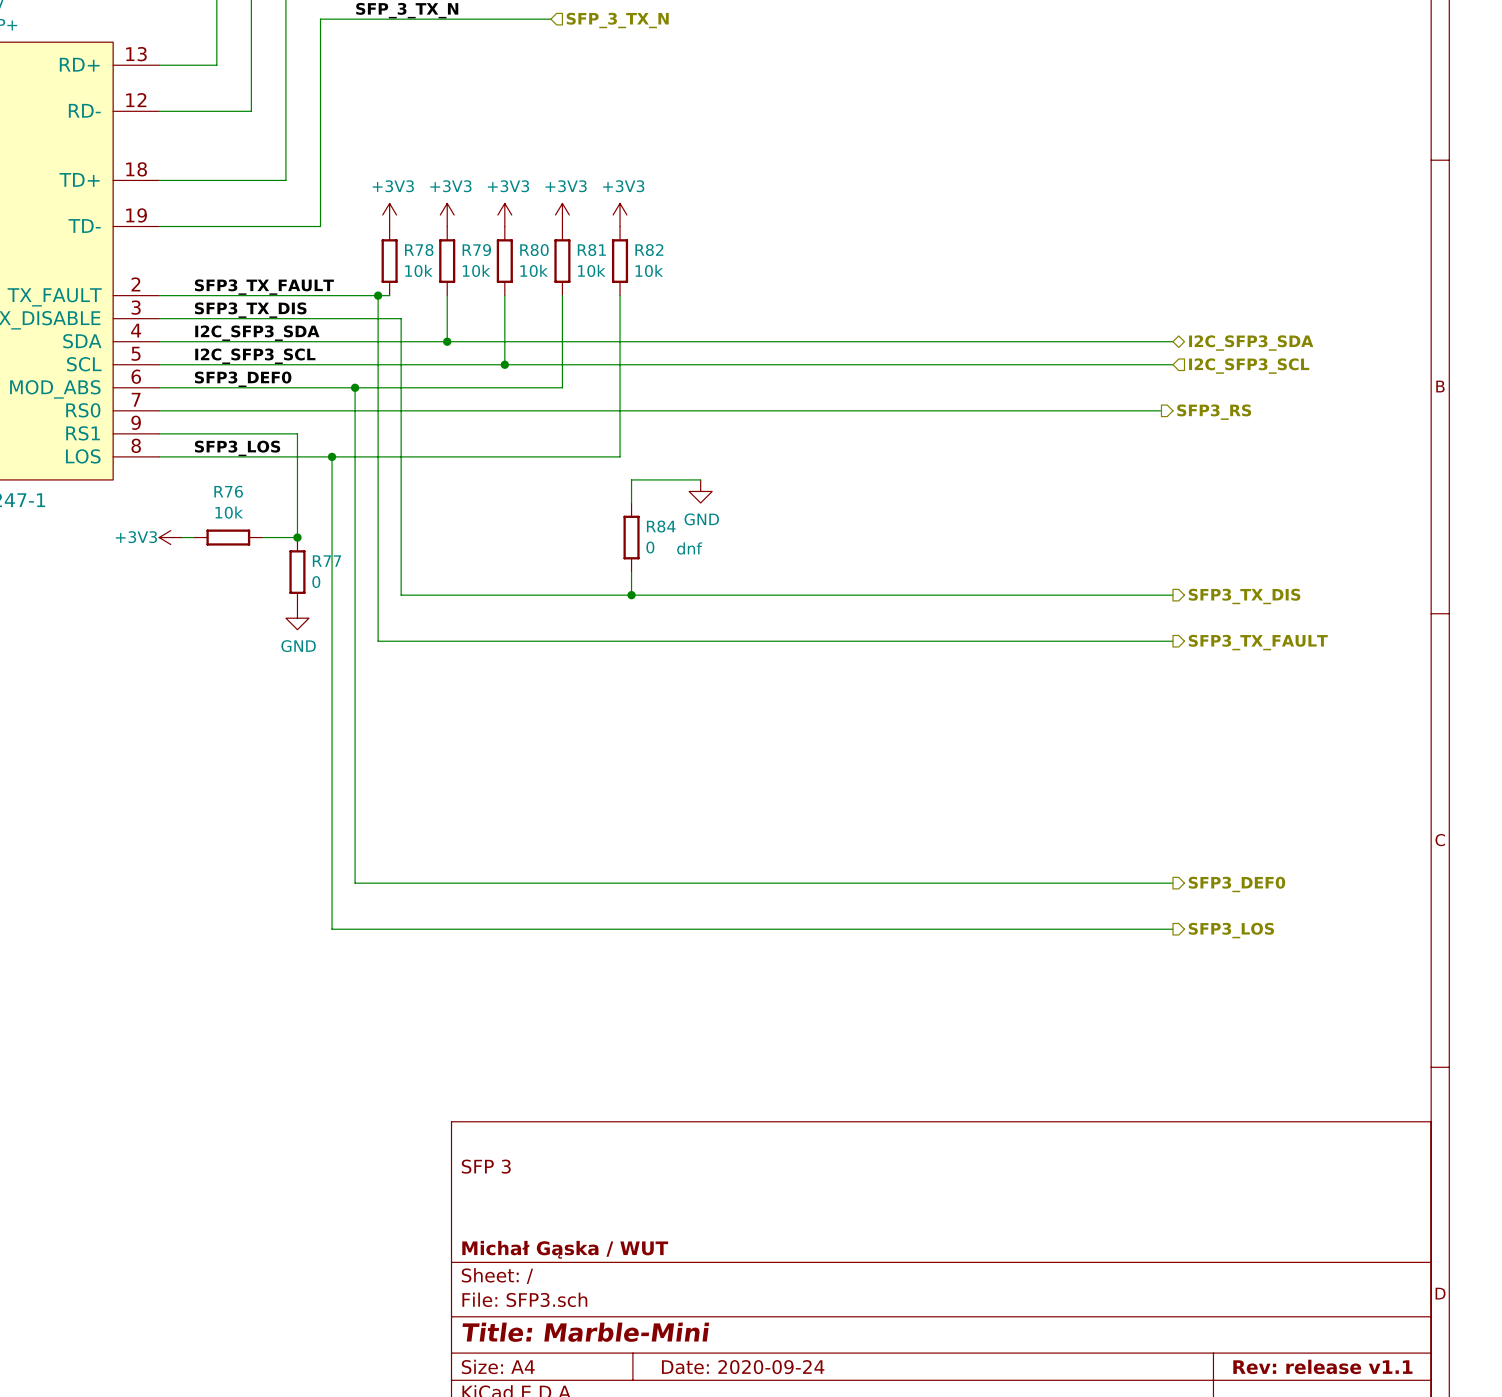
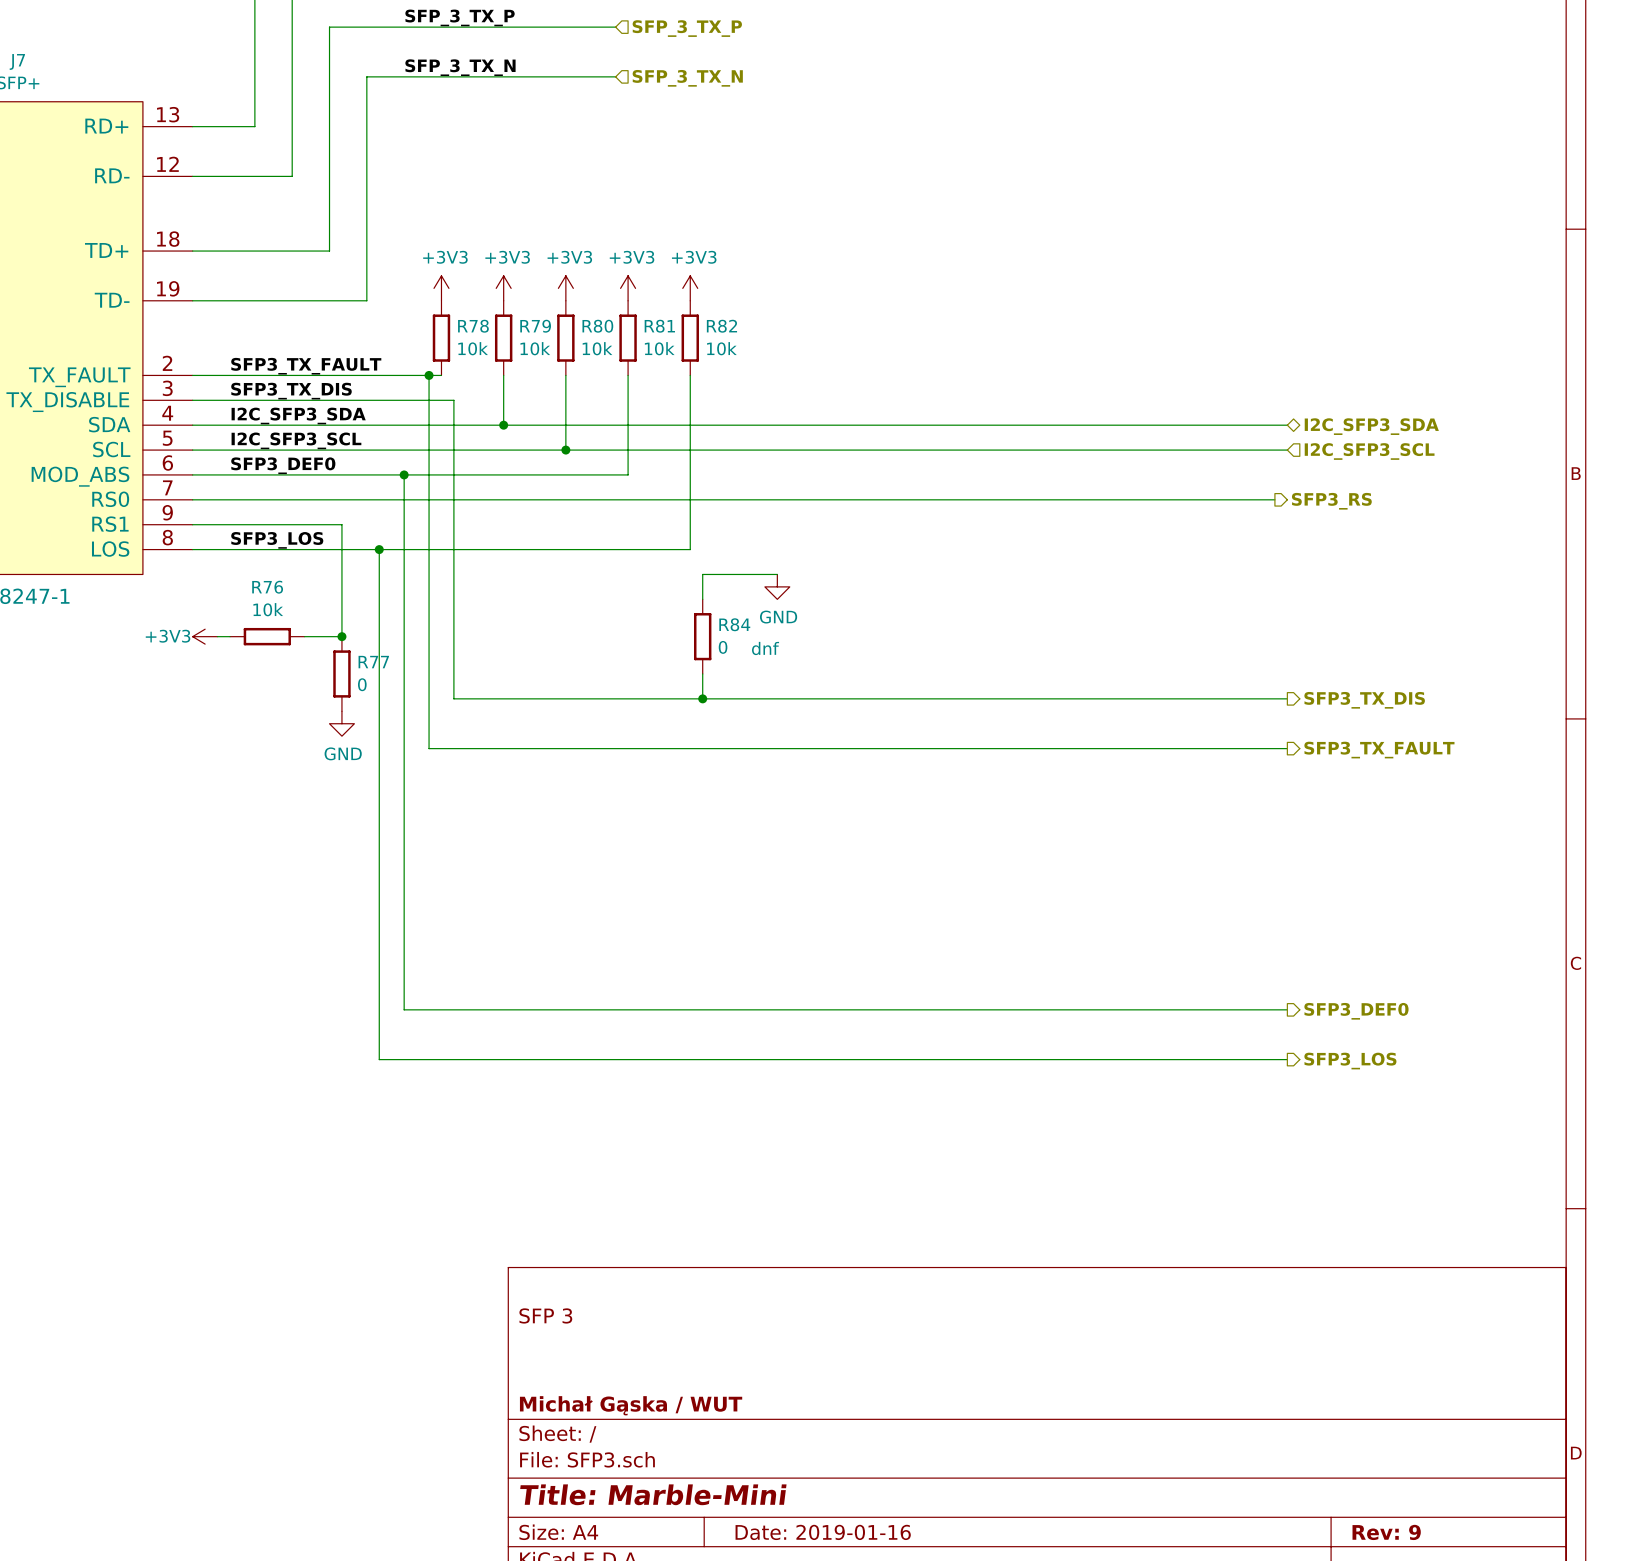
title block: Rev: release v1.1 (1322, 1366) -> Rev: 9 (1386, 1532)
title block: Date: 2020-09-24 (743, 1367) -> Date: 2019-01-16 (823, 1532)

